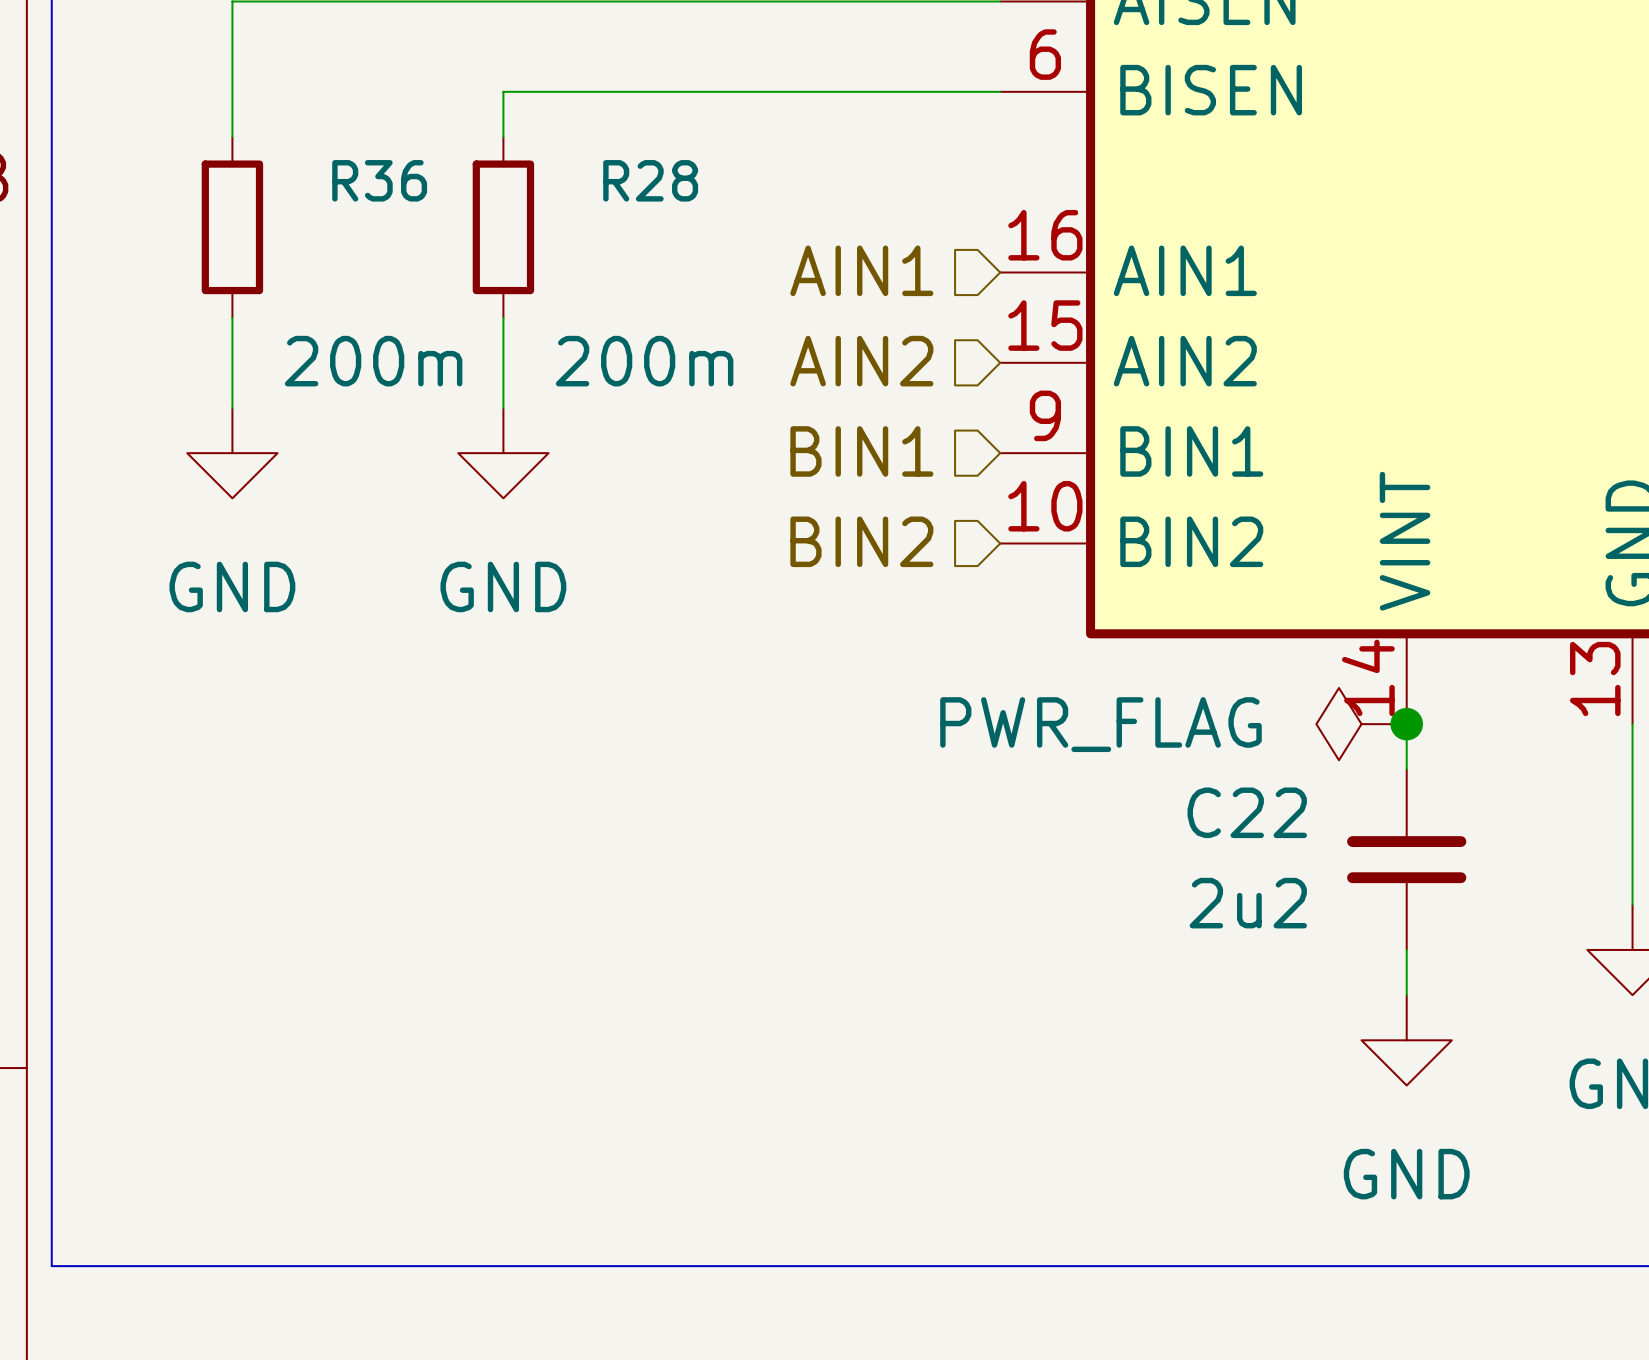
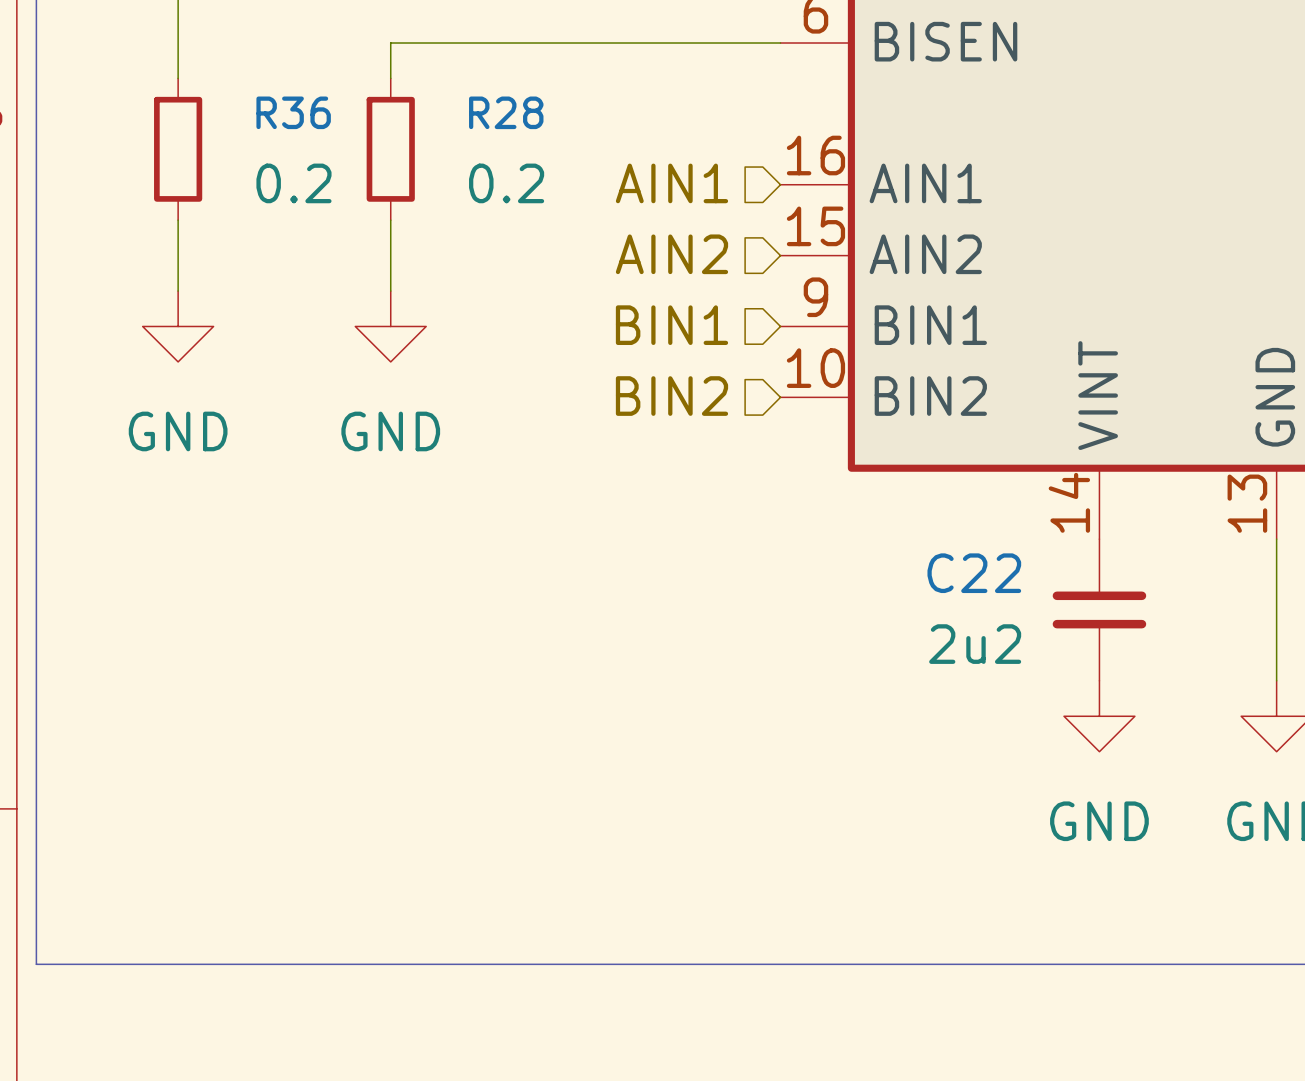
R36 value: 200m (373, 361) -> 0.2 (293, 183)
R28 value: 200m (644, 361) -> 0.2 (506, 183)
power symbol: PWR_FLAG (1361, 724) -> none
junction: (1406, 724) -> none
C22 position: (1406, 859) -> (1099, 609)
wire: (1406, 949) (1406, 995) -> none
power symbol position: GND (1406, 1040) -> GND (1099, 716)

